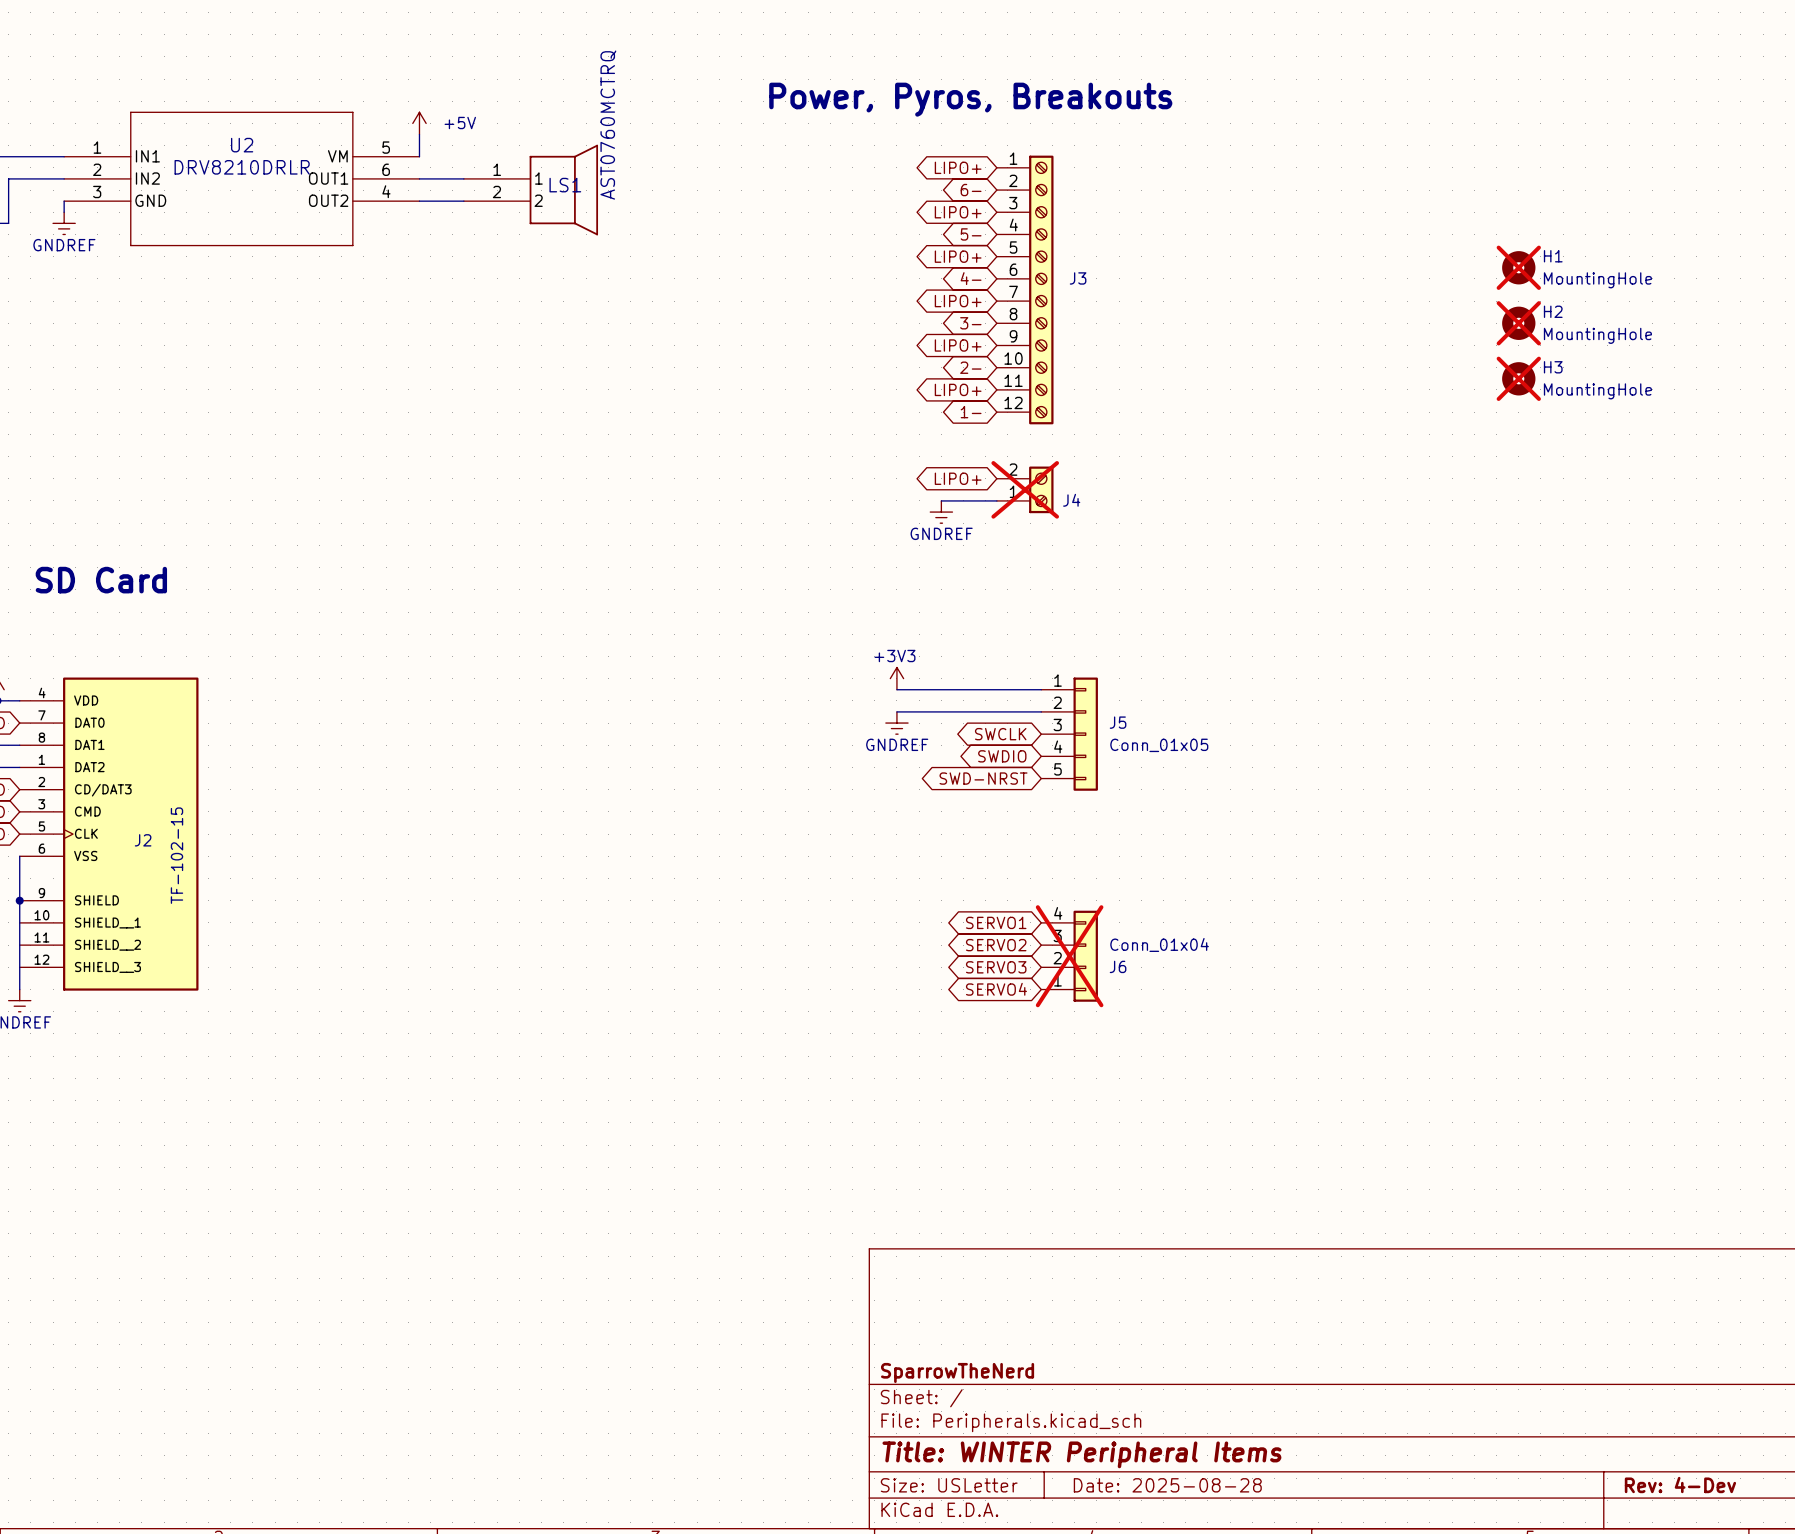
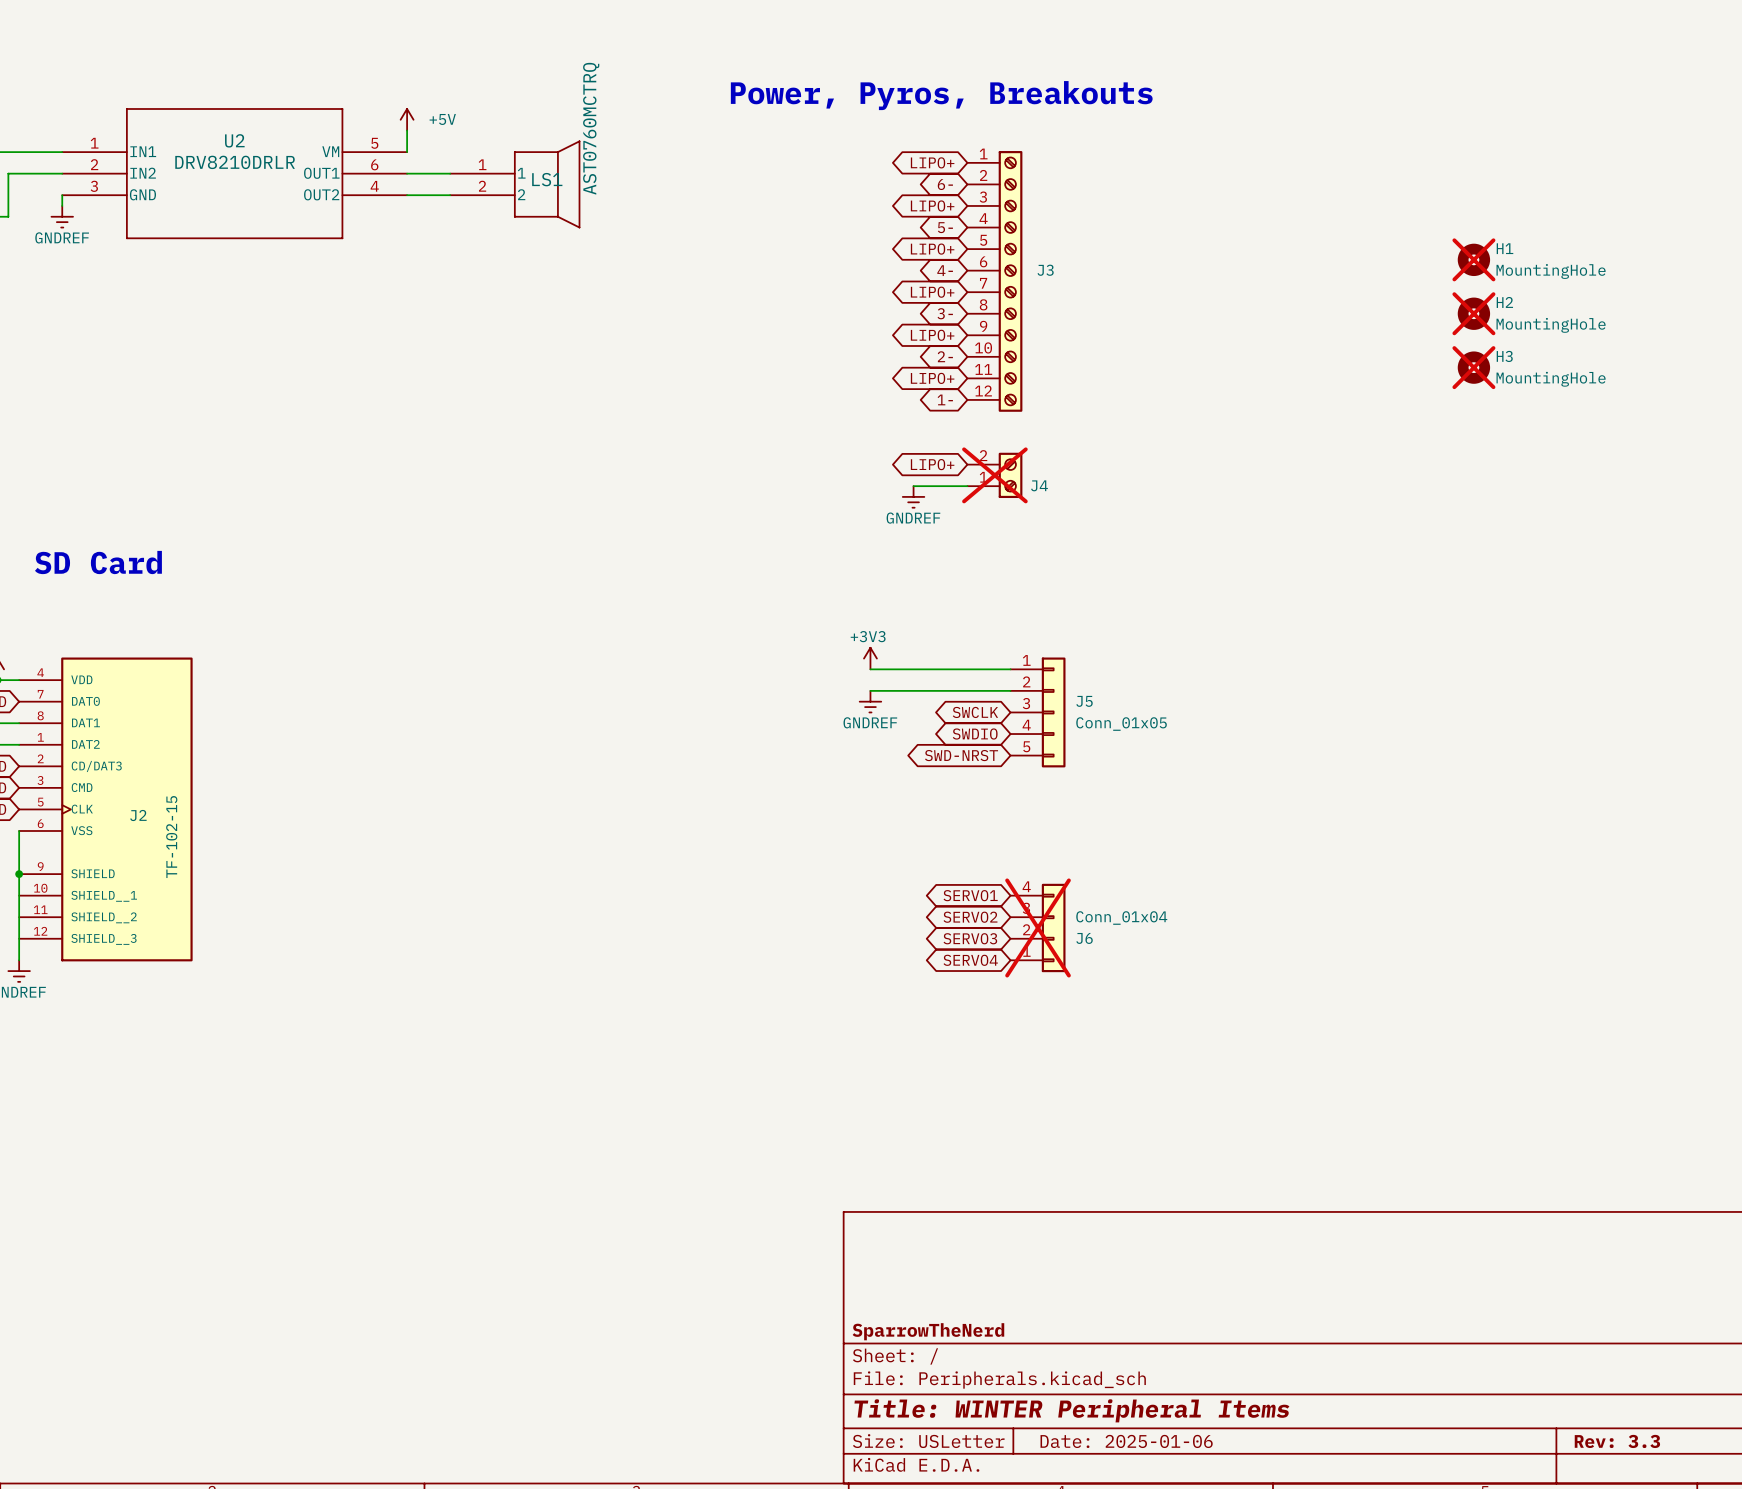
title block: Date: 2025-08-28 (1167, 1485) -> Date: 2025-01-06 (1126, 1441)
title block: Rev: 4-Dev (1680, 1485) -> Rev: 3.3 (1617, 1441)

